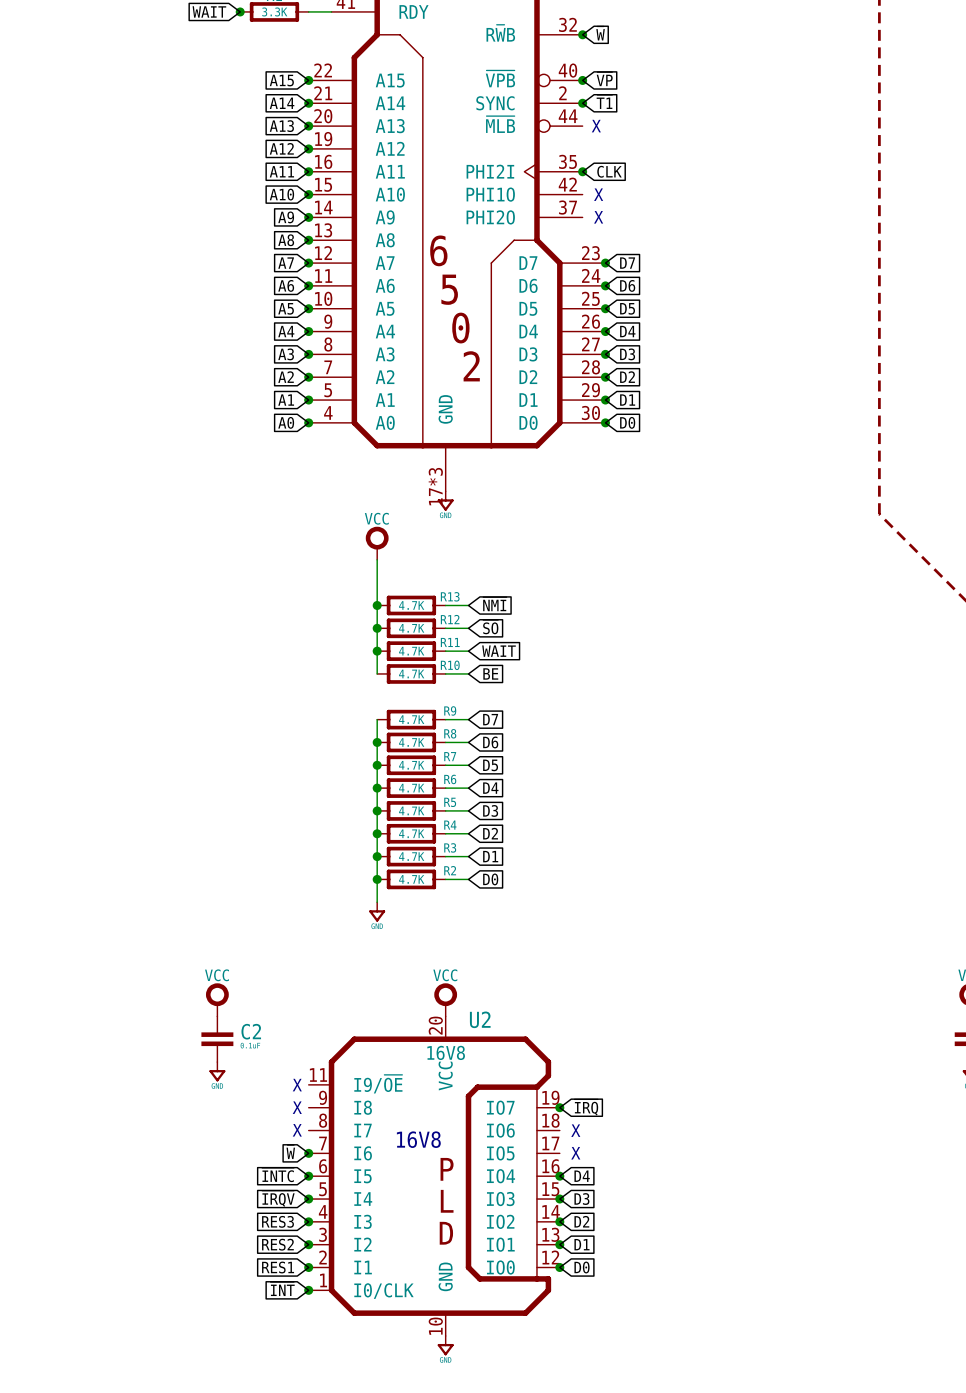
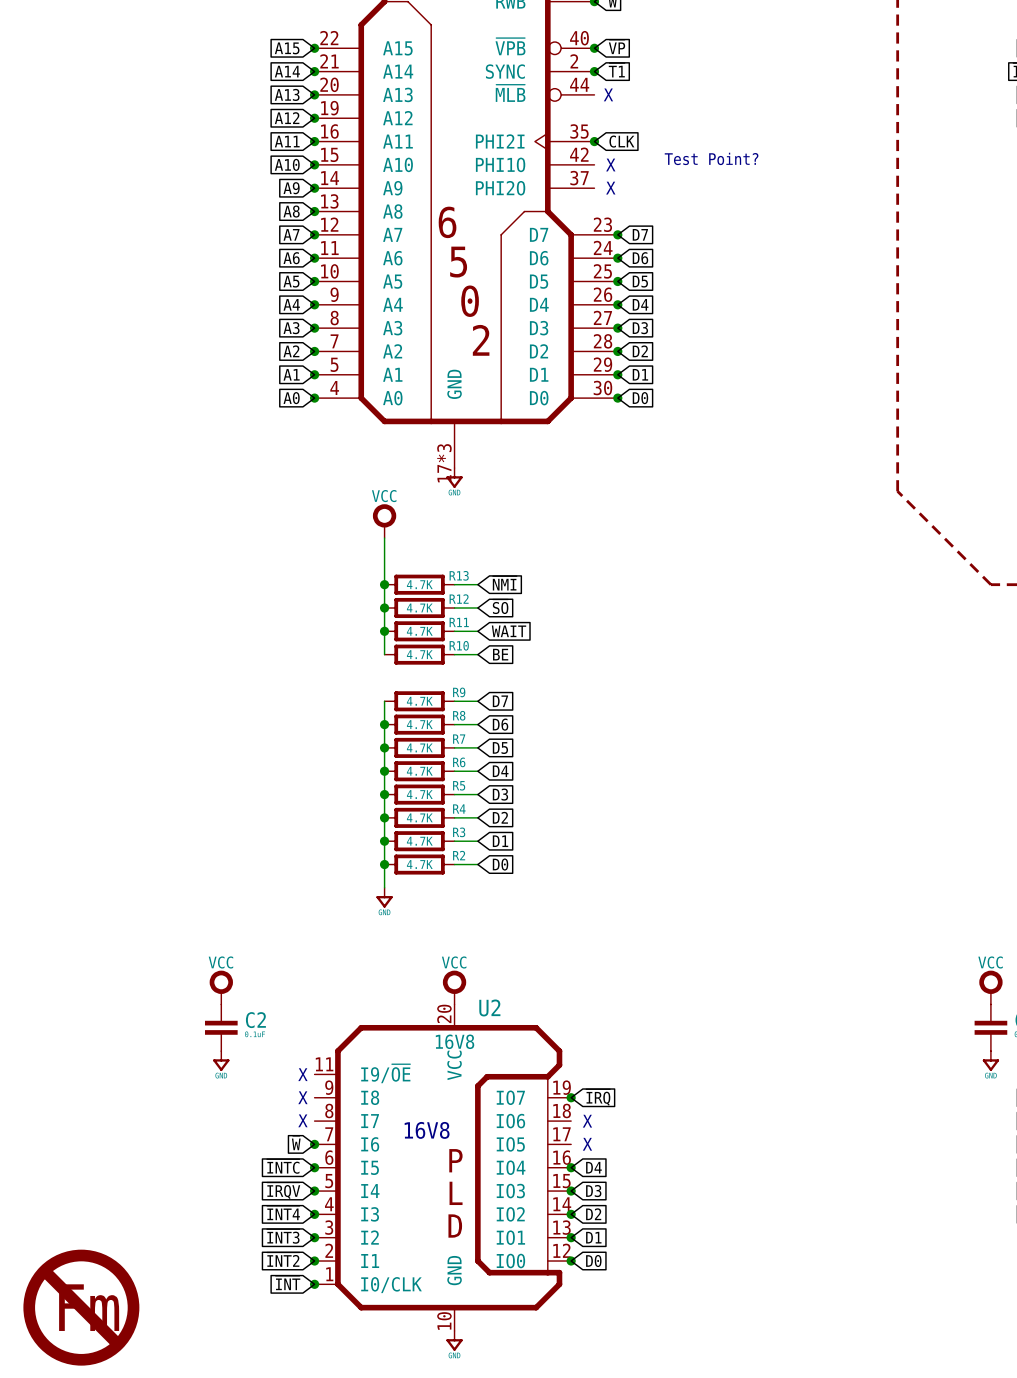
text: none -> Test Point? (711, 158)
global label: RES3 (278, 1221) -> ~{INT4} (283, 1213)
global label: RES2 (277, 1244) -> ~{INT3} (283, 1236)
global label: RES1 (278, 1267) -> ~{INT2} (283, 1259)
part: none -> (81, 1307)

